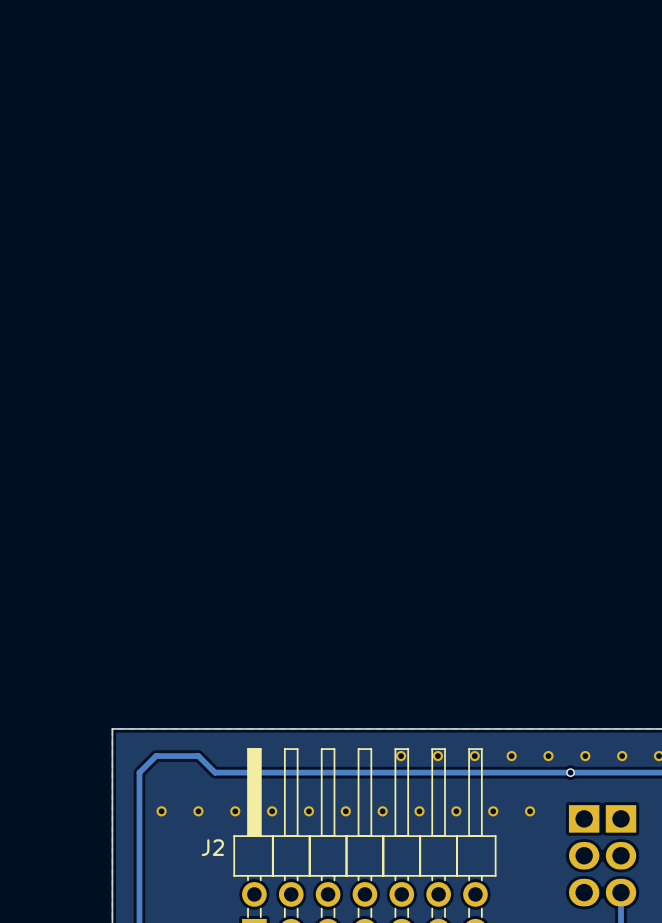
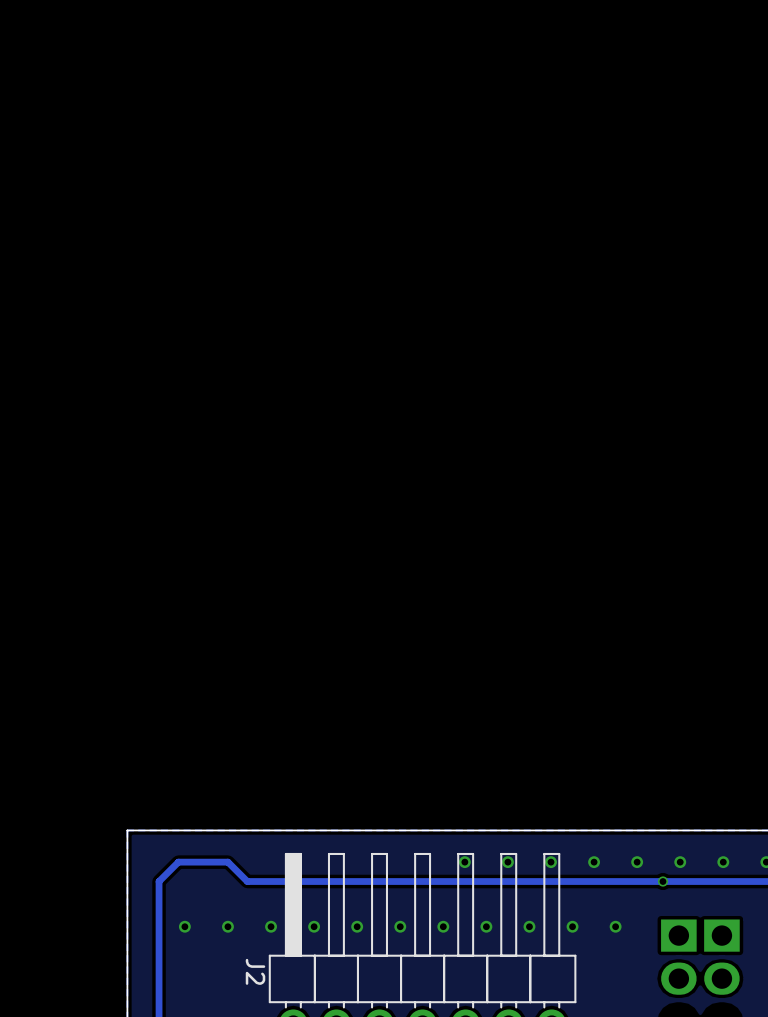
J2 name rotation: 0° (212, 847) -> 90° clockwise (255, 971)

